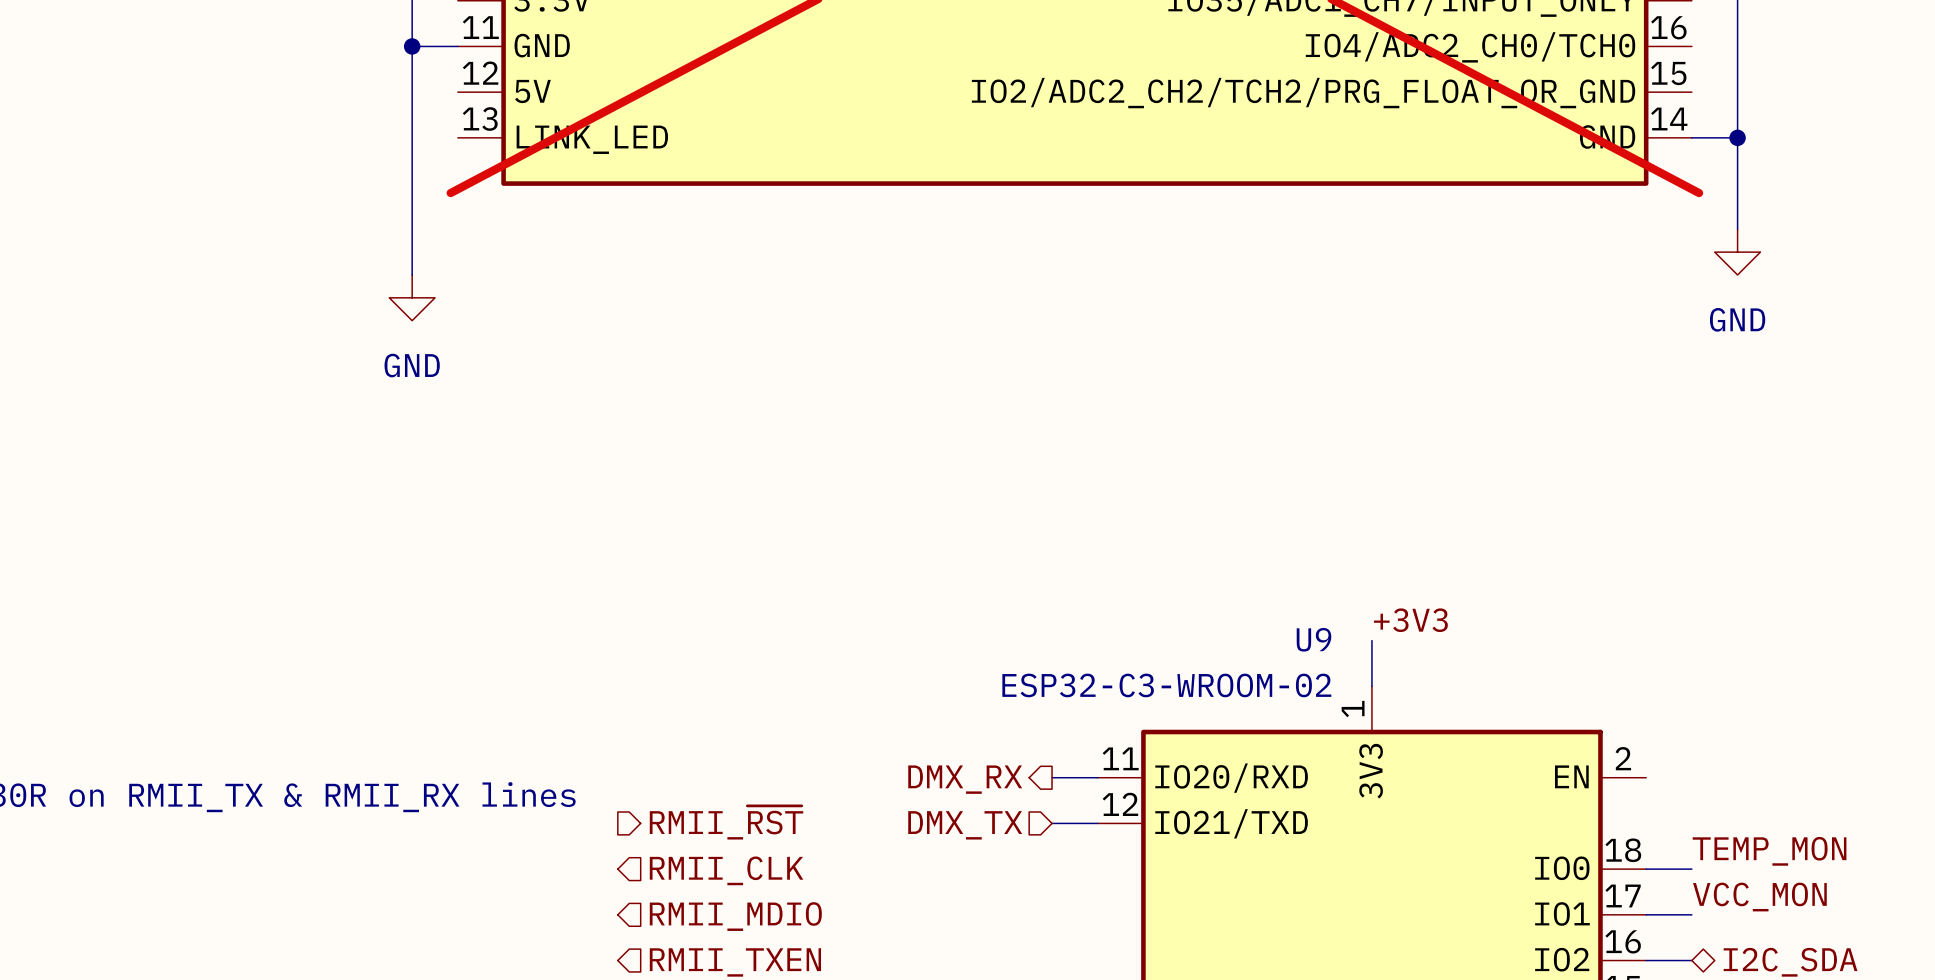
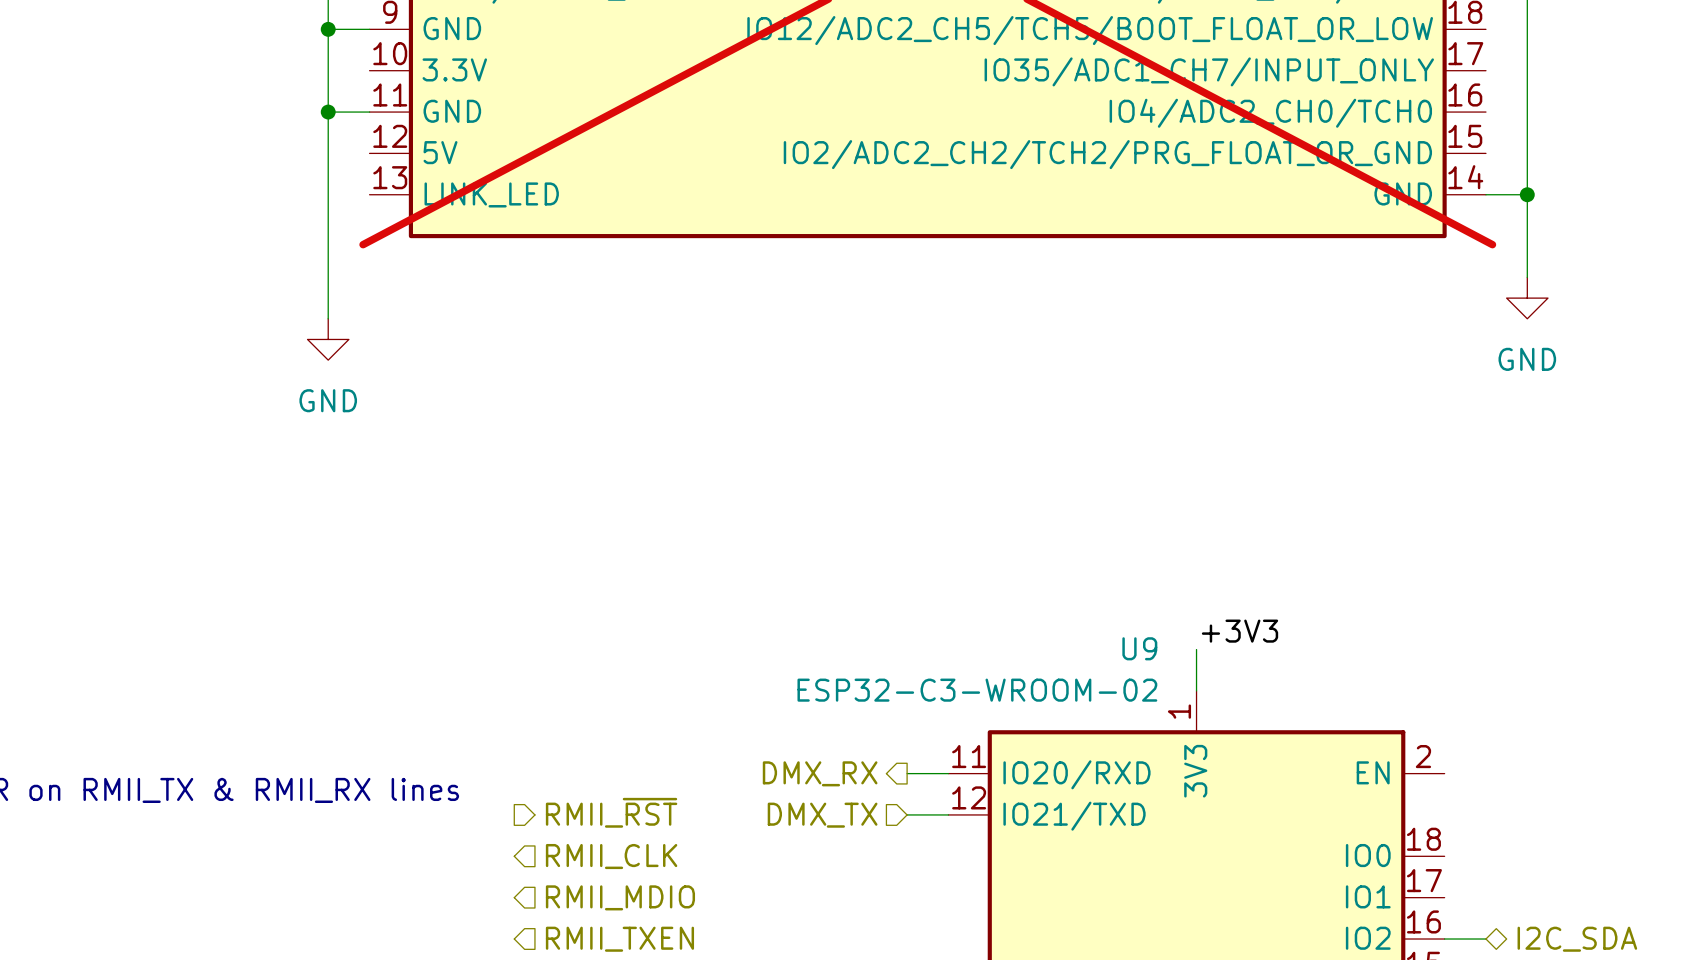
label: TEMP_MON (1769, 851) -> none
wire: (1646, 869) (1691, 869) -> none
label: VCC_MON (1759, 897) -> none
wire: (1646, 914) (1691, 914) -> none

